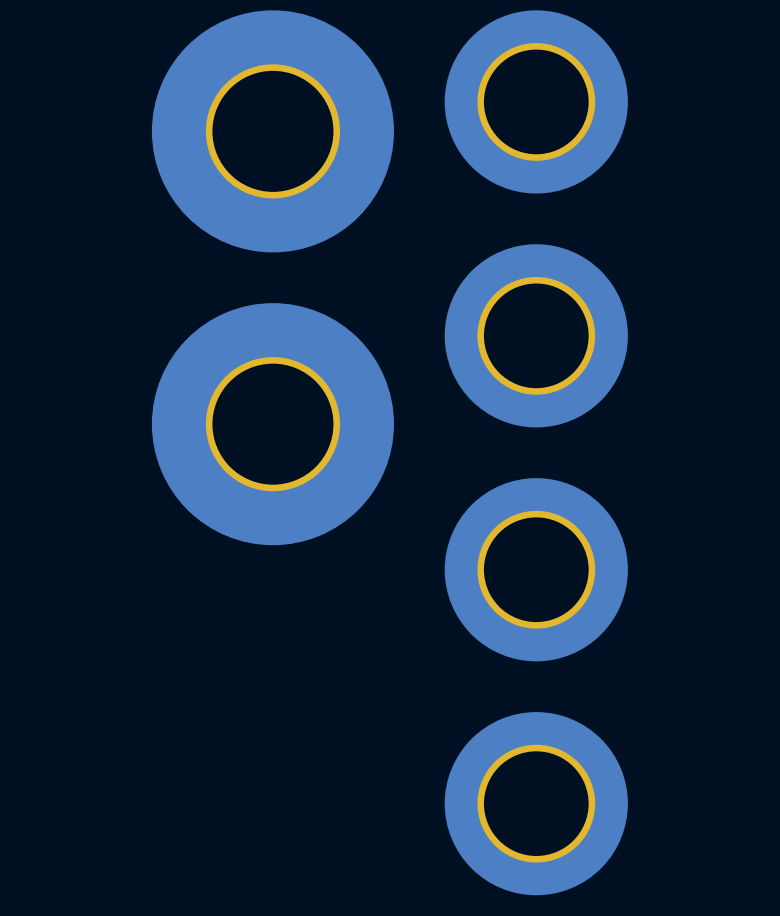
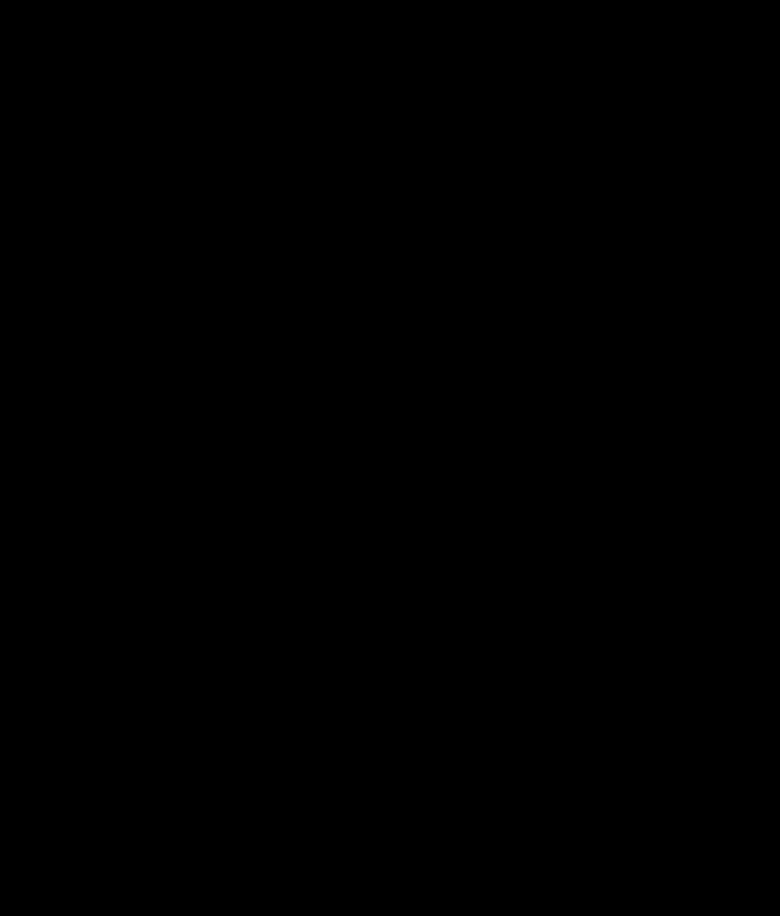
part: (536, 101) -> none
part: (272, 131) -> none
part: (536, 335) -> none
part: (272, 424) -> none
part: (536, 569) -> none
part: (536, 803) -> none

